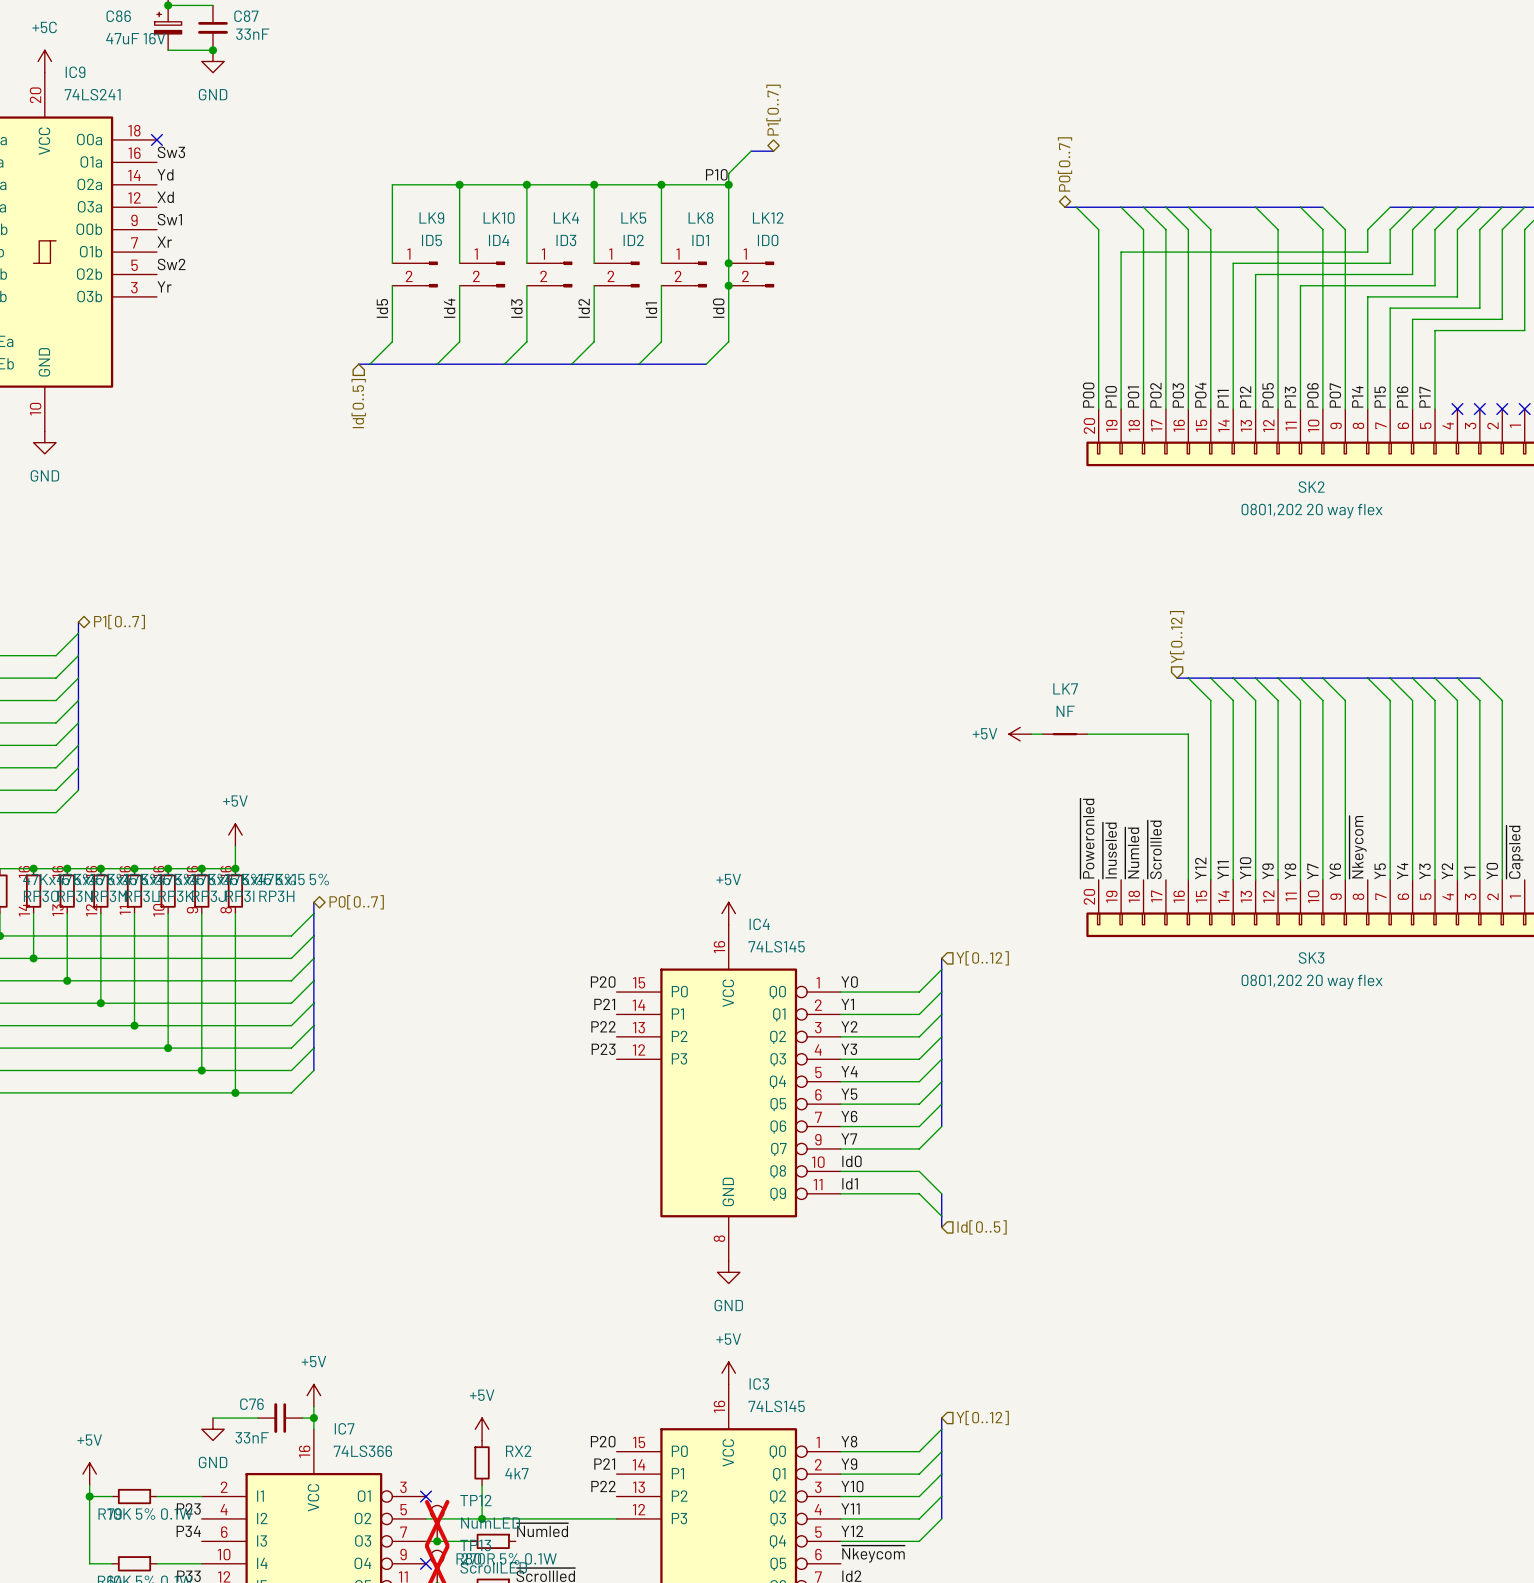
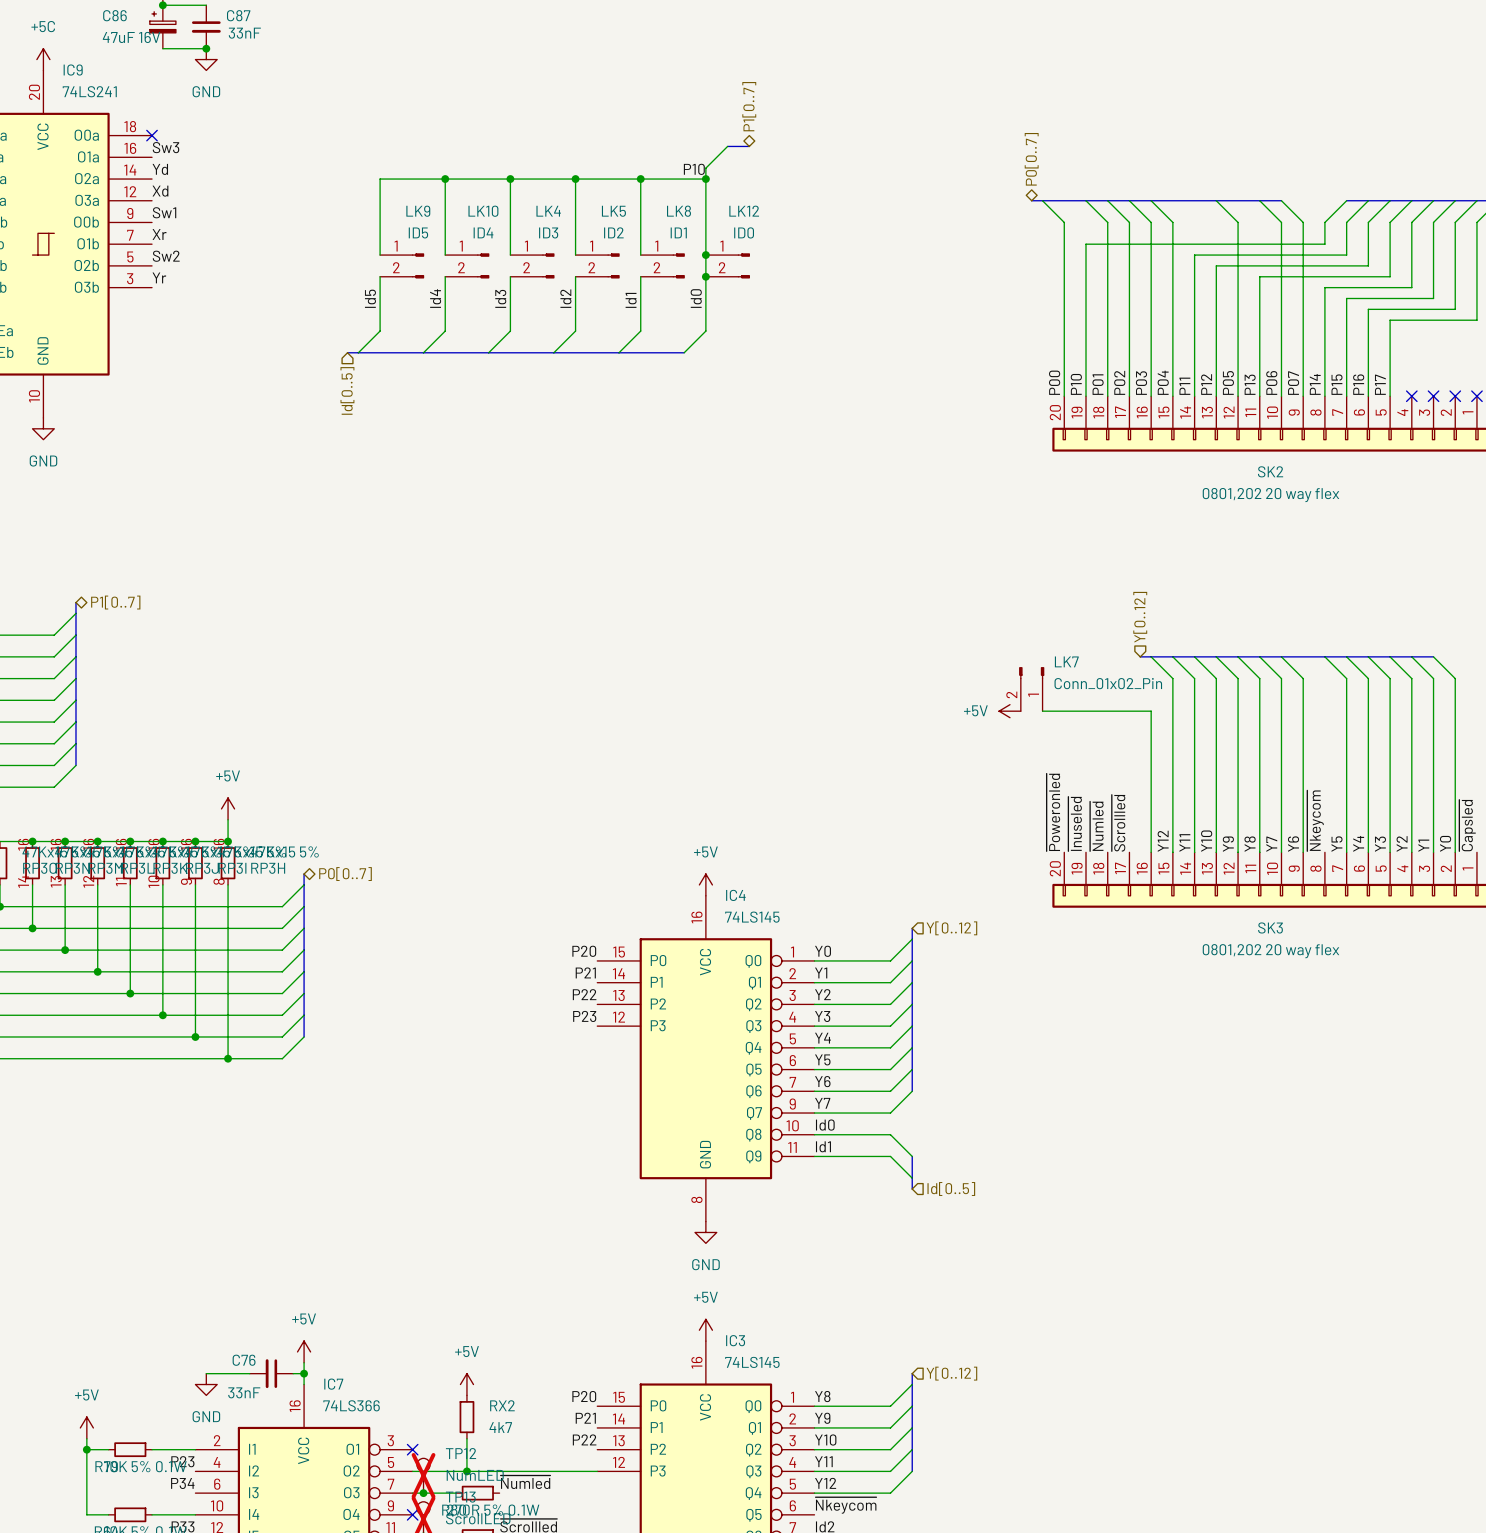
LK7 name position: LK7 (1065, 688) -> LK7 (1066, 661)
LK7 value: NF (1065, 711) -> Conn_01x02_Pin (1108, 683)
LK7 symbol: [1042, 733, 1088, 736] -> [1019, 667, 1045, 712]
power symbol position: +5V (1020, 734) -> +5V (1009, 711)

